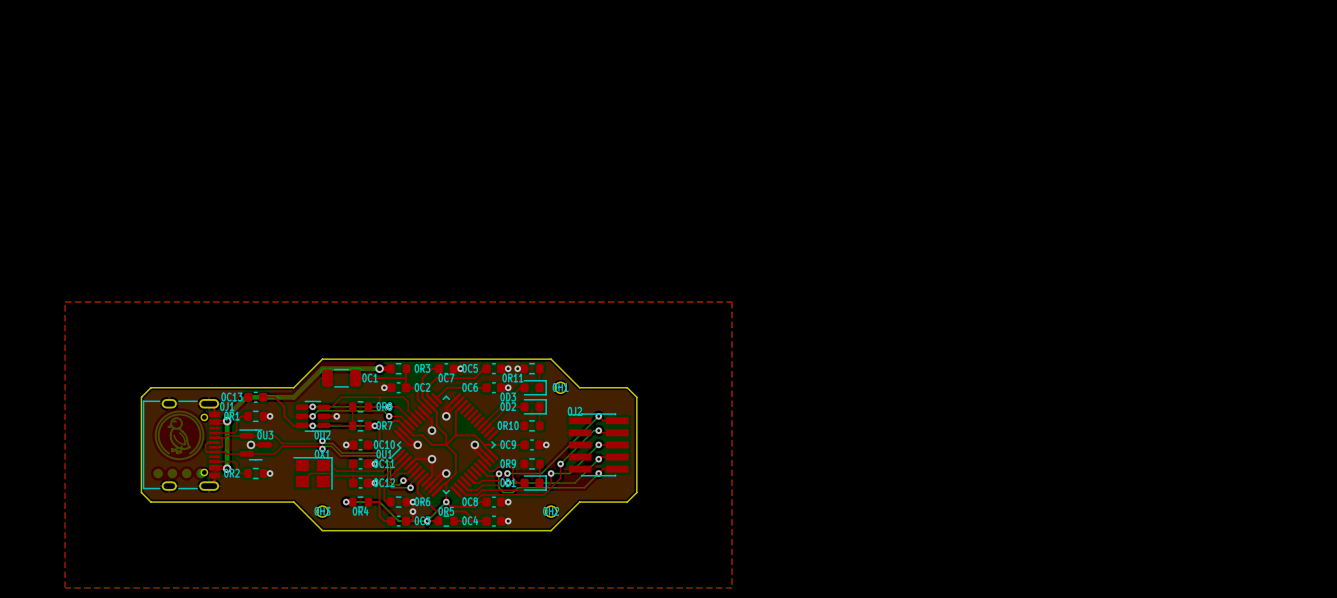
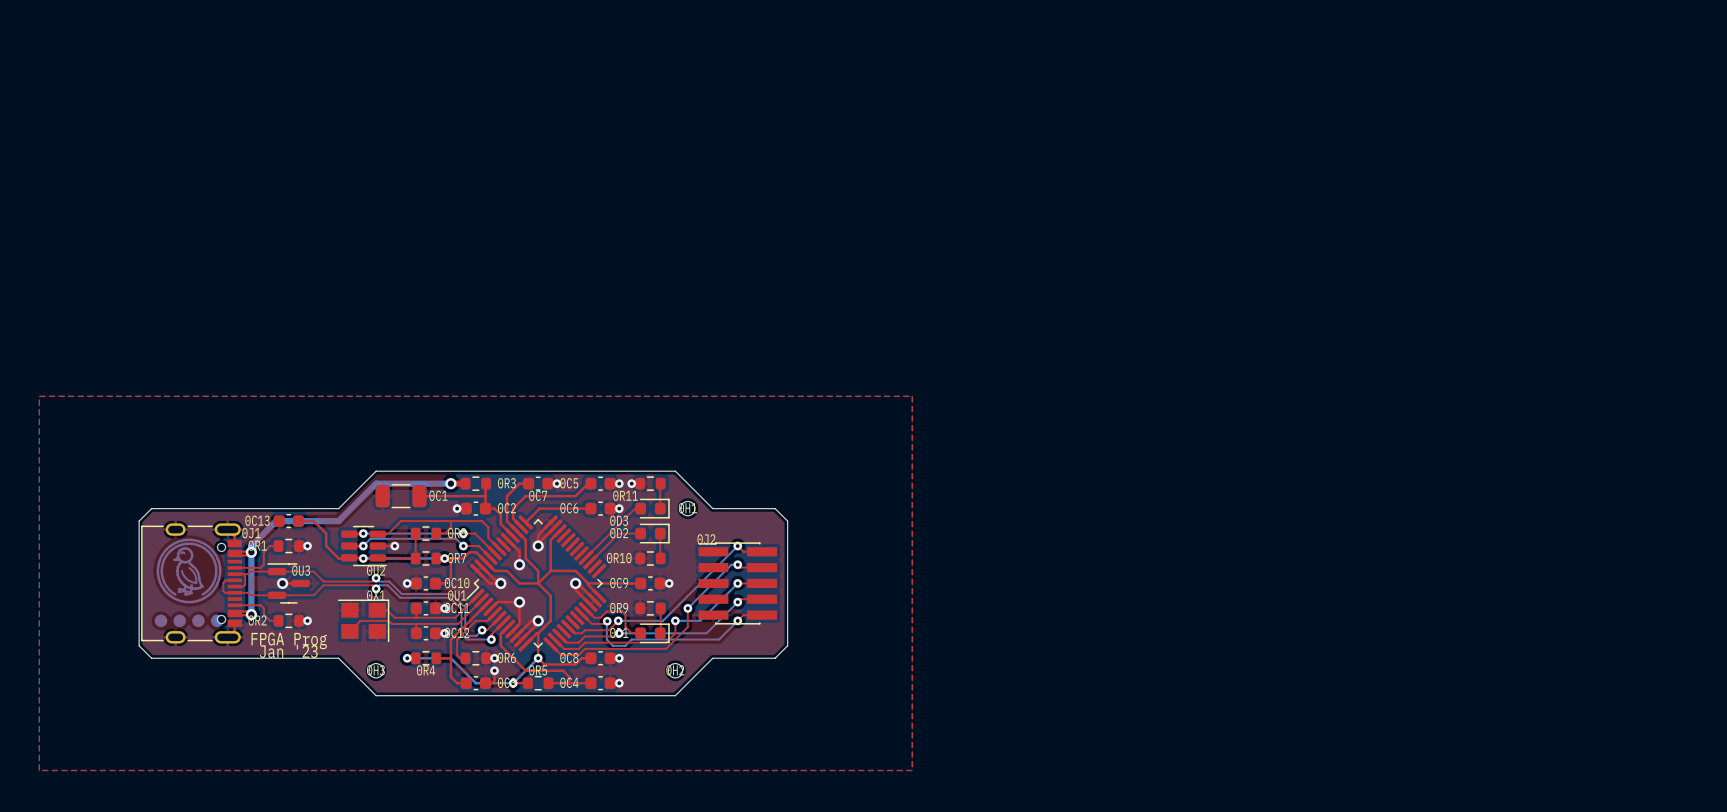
text: none -> FPGA Prog (289, 640)
text: none -> Jan '23 (288, 651)

